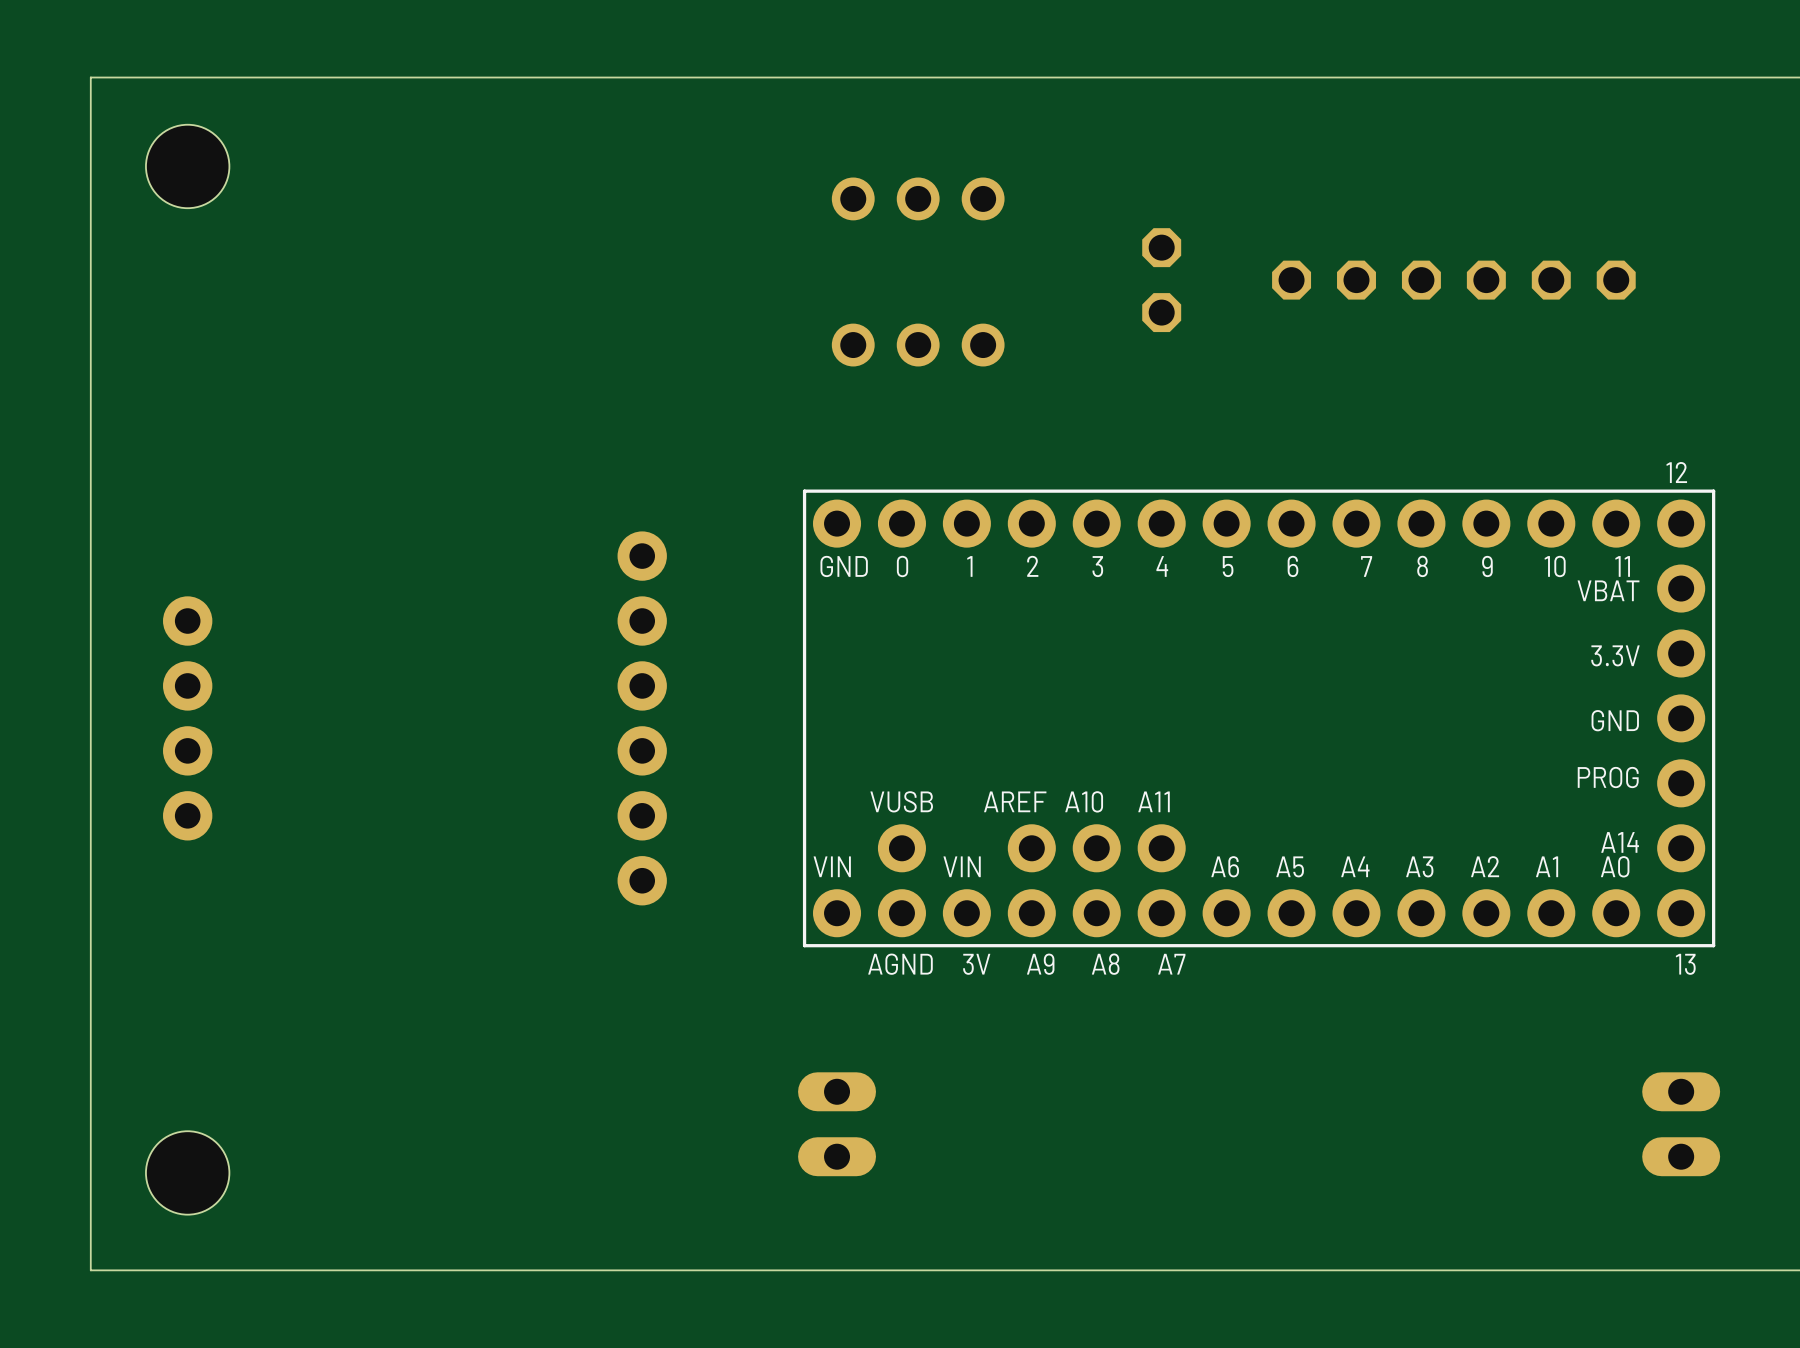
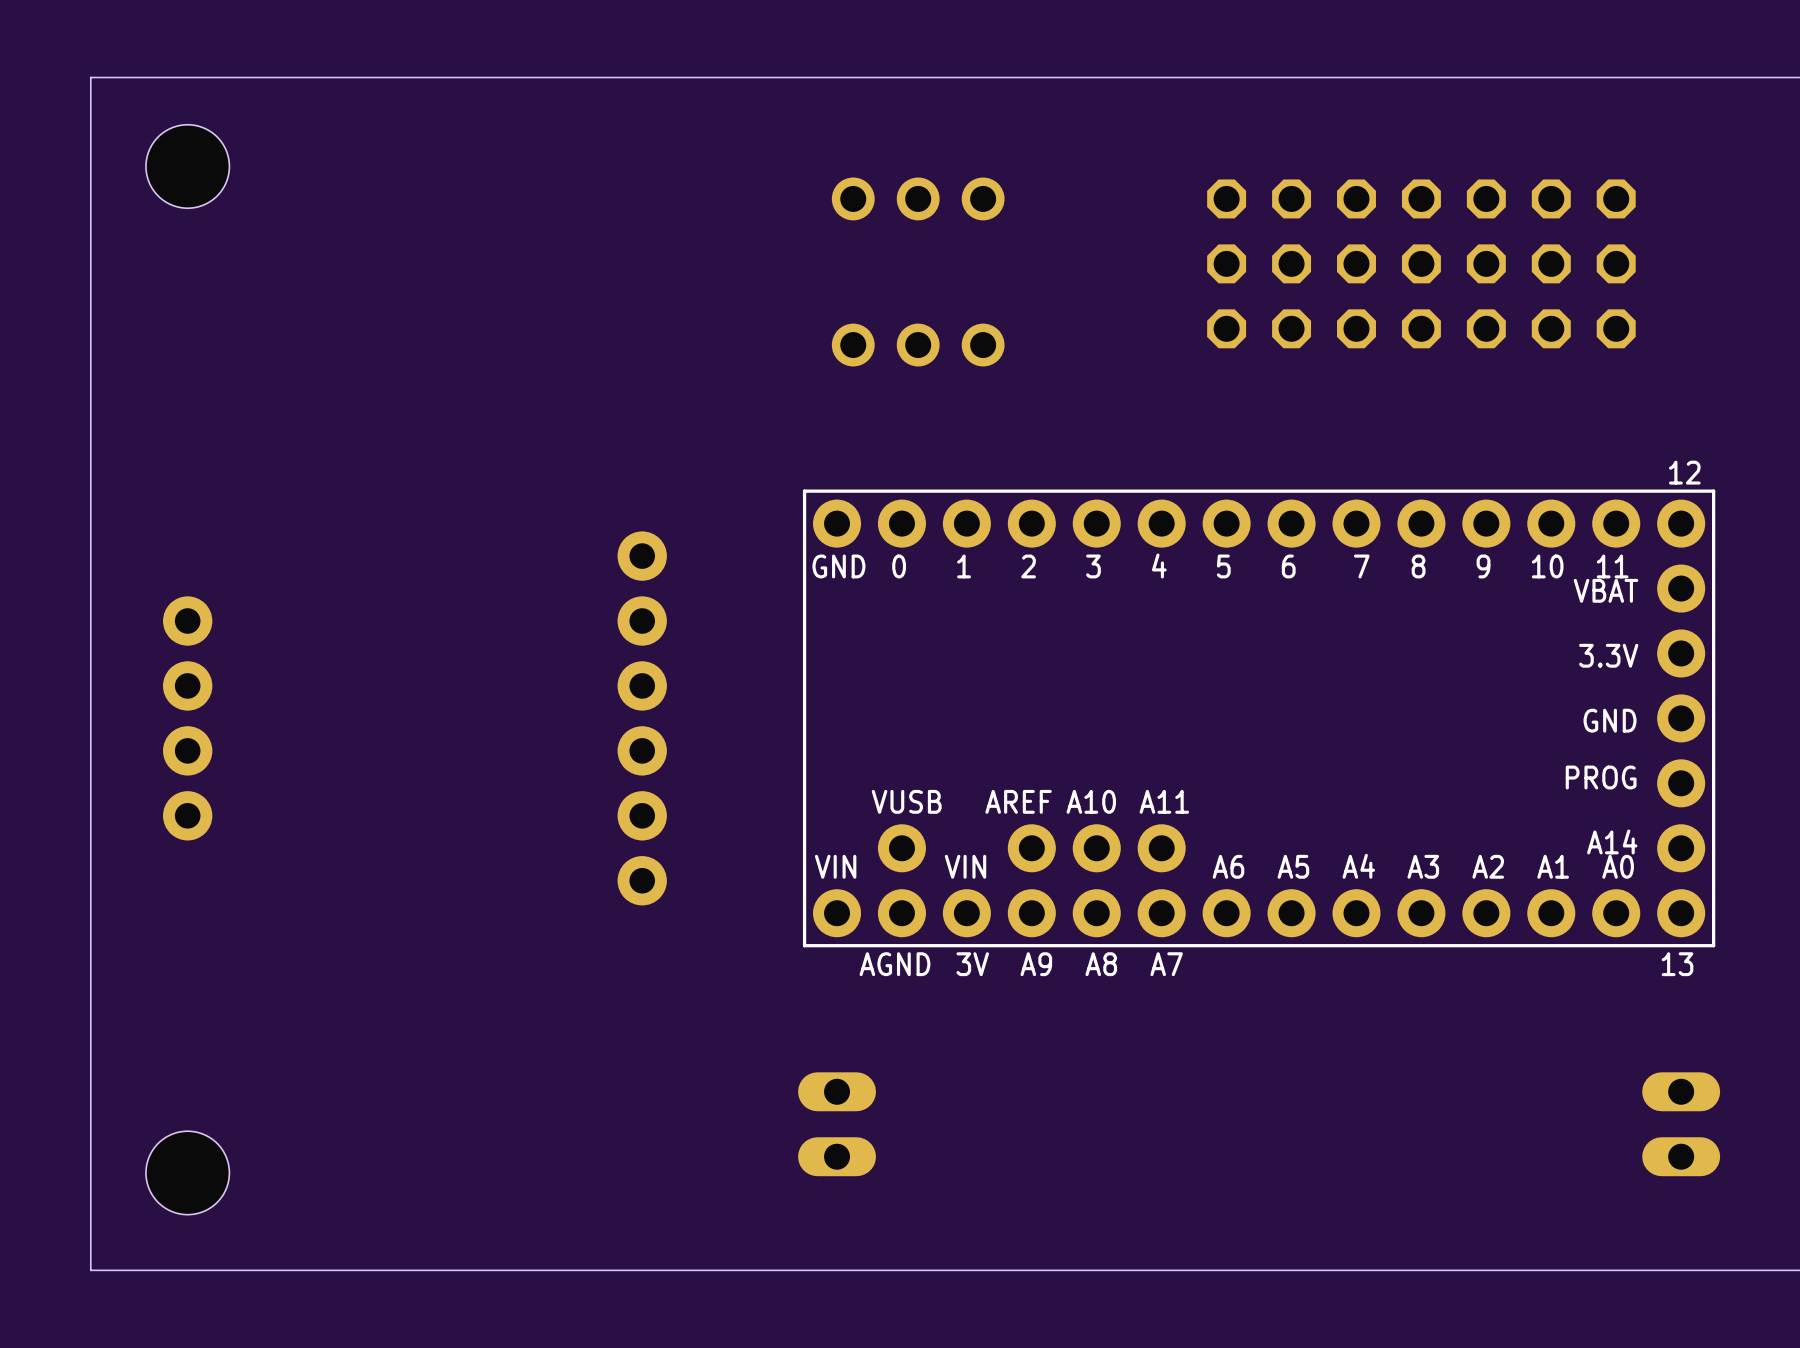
part: none -> (1226, 198)
part: none -> (1453, 231)
part: (1161, 247) -> none
part: none -> (1226, 263)
part position: (1453, 280) -> (1453, 328)
part: (1161, 312) -> none
part: none -> (1226, 328)

